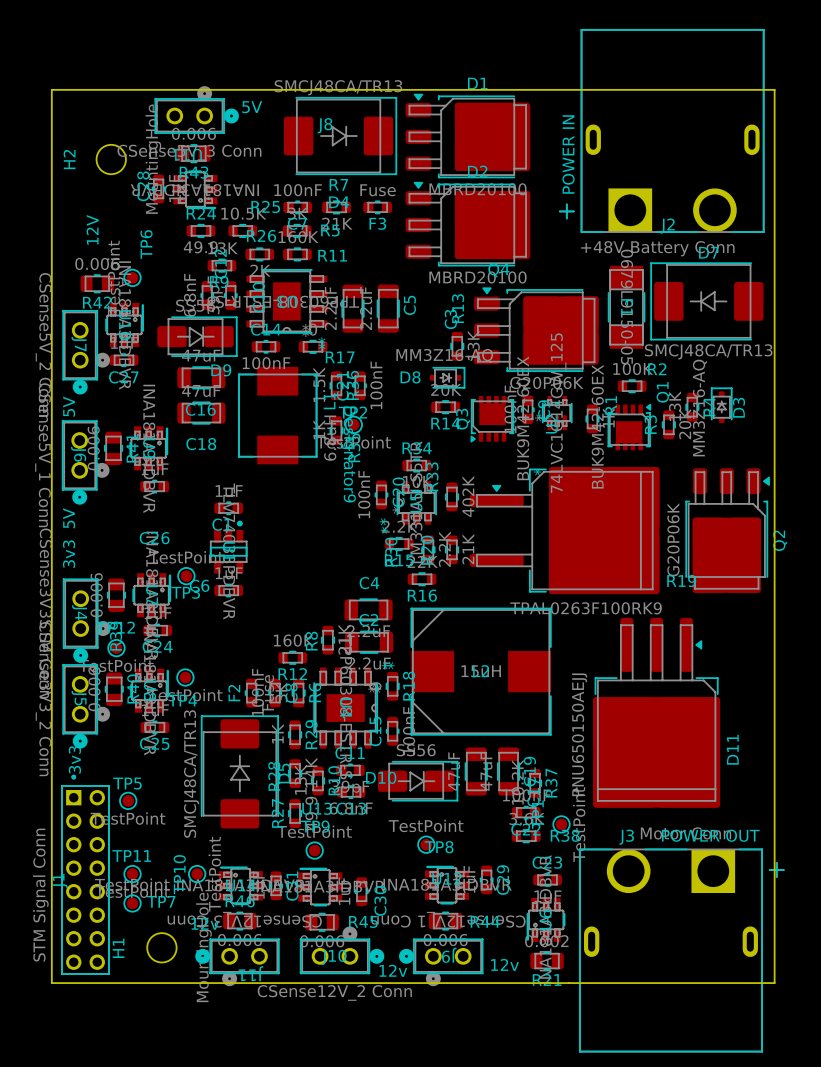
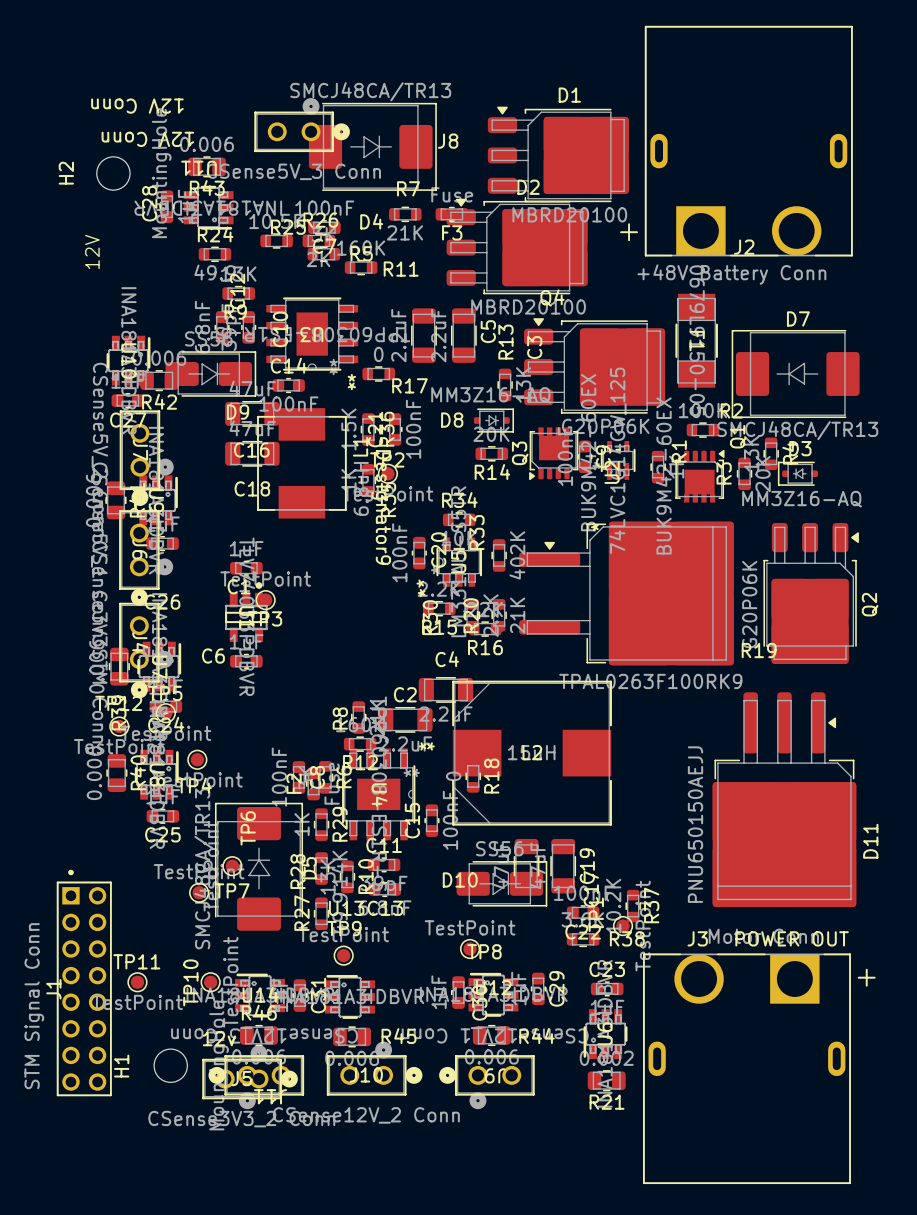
board edge: (51, 89) (774, 89) (774, 983) (51, 983) (51, 89) -> none
text: none -> 12V Conn (137, 106)
text: 5V (252, 107) -> none
J8 position: (196, 110) -> (302, 125)
text: none -> 12V Conn (147, 139)
D1 position: (467, 135) -> (558, 154)
text: POWER IN (568, 154) -> none
R7 position: (336, 207) -> (405, 214)
F3 position: (377, 207) -> (451, 214)
R25 position: (242, 230) -> (276, 240)
R26 position: (259, 254) -> (318, 240)
R11 position: (297, 254) -> (361, 267)
TP6 position: (132, 277) -> (232, 866)
R42 position: (97, 283) -> (159, 380)
D7 position: (706, 301) -> (795, 373)
C3 position: (353, 308) -> (423, 335)
C5 position: (388, 308) -> (463, 335)
R17 position: (313, 346) -> (378, 373)
J7 position: (86, 352) -> (146, 458)
C16 position: (201, 377) -> (252, 413)
D3 rotation: 0° (721, 405) -> 90° counterclockwise (797, 473)
text: 5V (69, 406) -> none
C18 position: (201, 413) -> (252, 453)
Q3 position: (492, 419) -> (553, 453)
J6 position: (85, 462) -> (146, 557)
text: 5V (69, 518) -> none
text: 3v3 (69, 554) -> none
TP3 position: (186, 576) -> (265, 600)
R16 position: (422, 579) -> (485, 629)
C4 position: (368, 609) -> (445, 689)
J4 position: (86, 620) -> (146, 650)
R12 position: (292, 657) -> (360, 744)
R18 position: (392, 686) -> (473, 776)
F2 position: (251, 693) -> (313, 784)
J5 rotation: 0° (86, 706) -> 90° counterclockwise (250, 1072)
J5 position: (86, 706) -> (250, 1072)
D11 position: (656, 712) -> (784, 799)
text: 3v3 (74, 759) -> none
D10 position: (418, 781) -> (501, 883)
R37 position: (535, 783) -> (633, 906)
TP5 position: (128, 800) -> (165, 713)
C30 position: (361, 891) -> (458, 992)
TP7 position: (132, 903) -> (199, 892)
text: 12v (504, 964) -> none
text: 12v (393, 970) -> none

